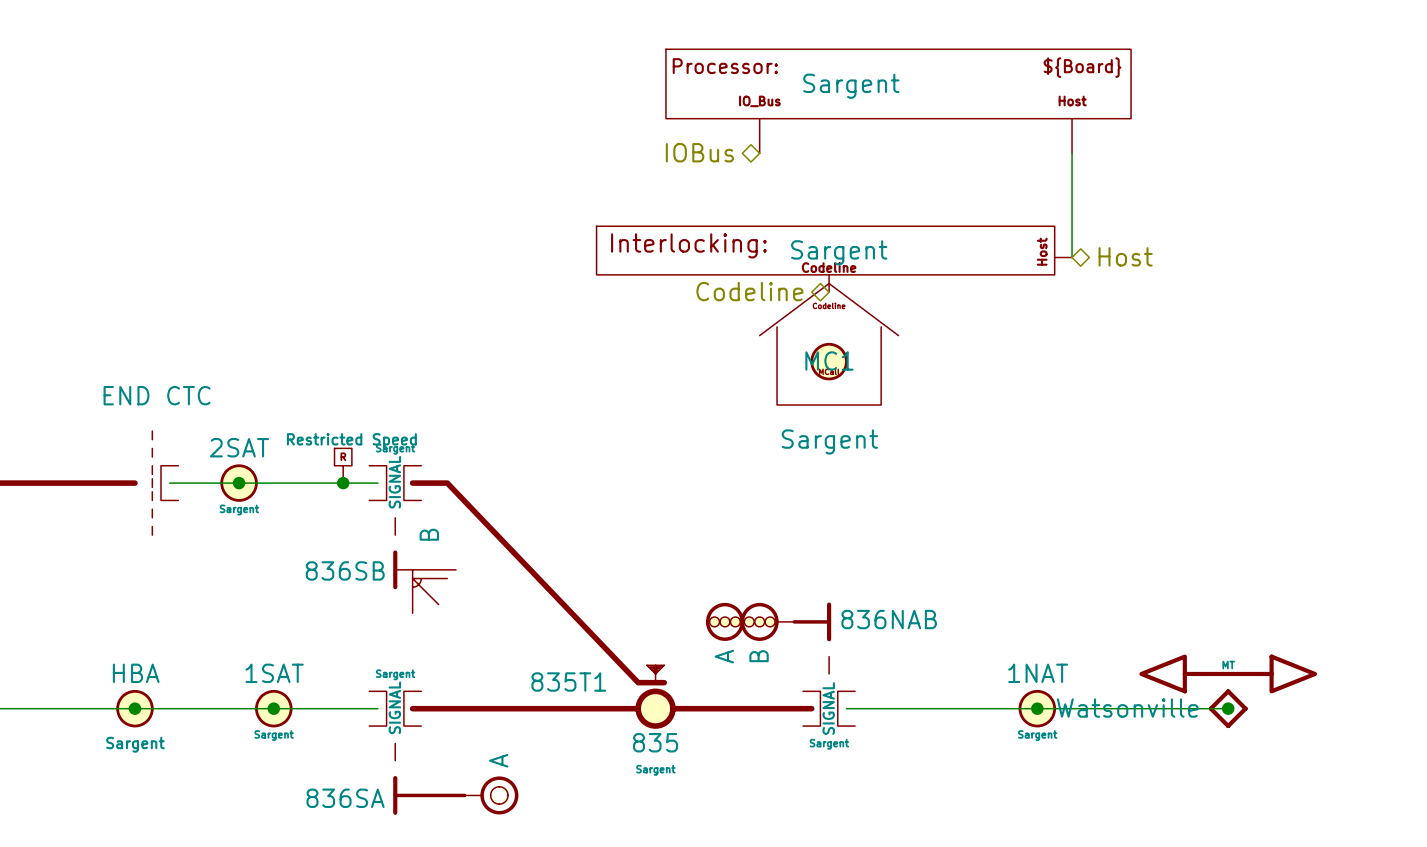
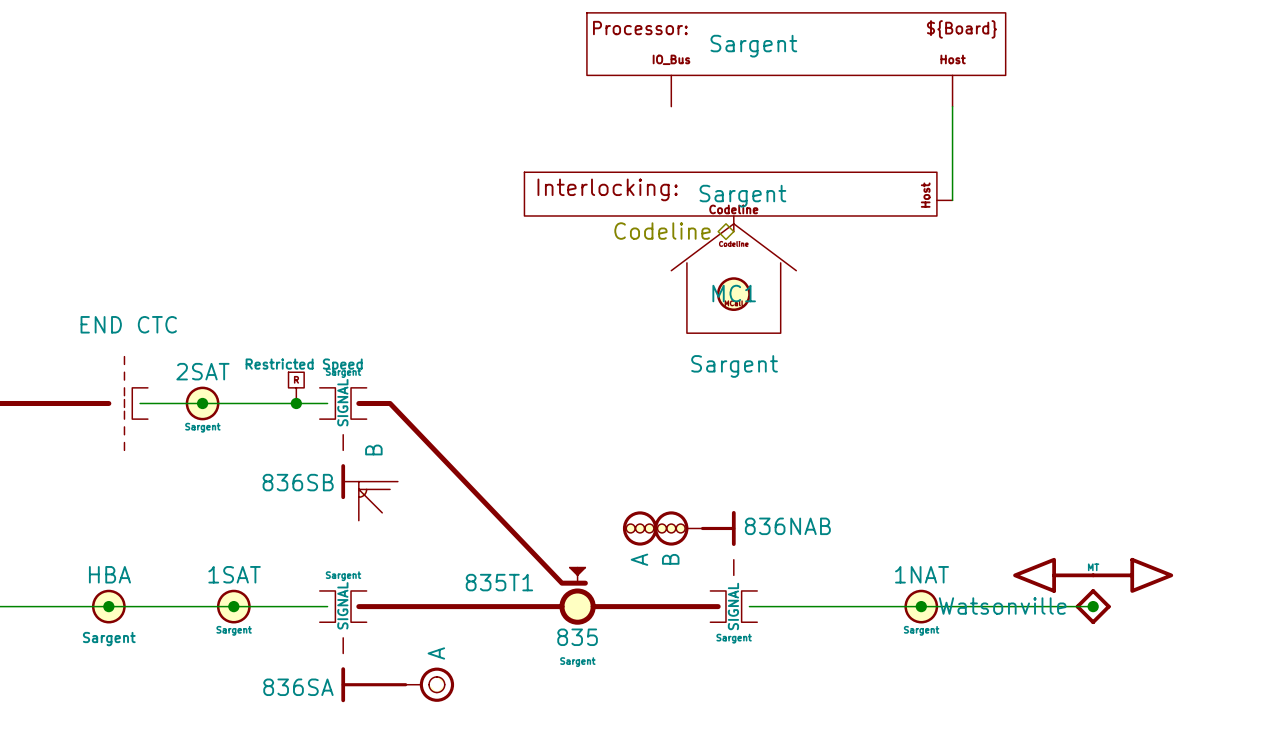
hierarchical label: IOBus (699, 152) -> none
hierarchical label: Host (1125, 256) -> none

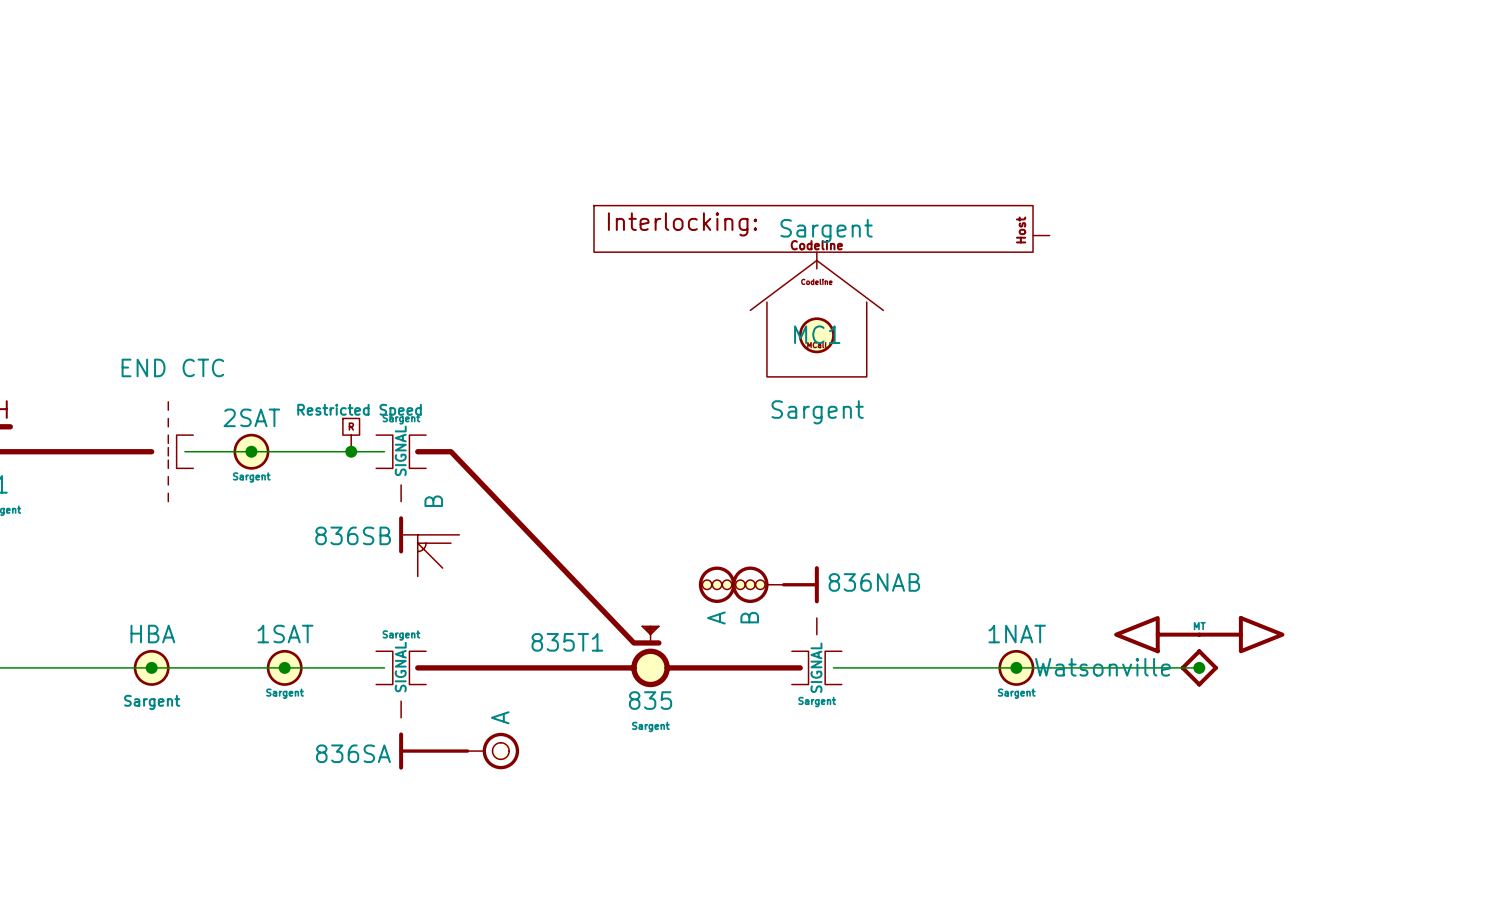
part: Sargent (796, 59) -> none
wire: (952, 106) (952, 200) -> none
hierarchical label: Codeline (662, 231) -> none

